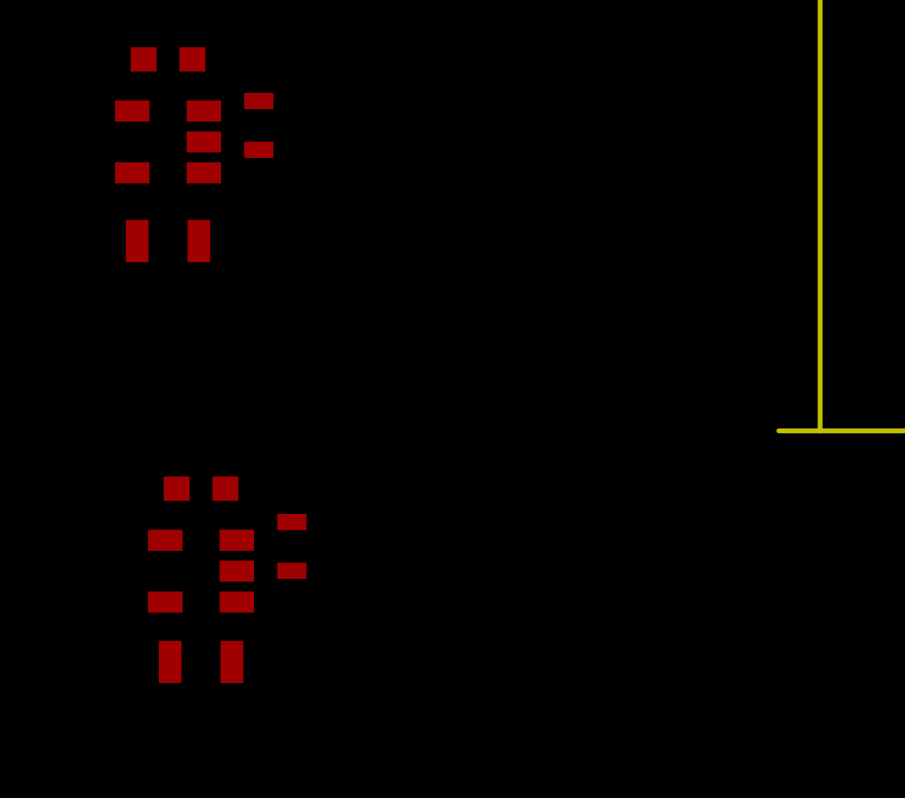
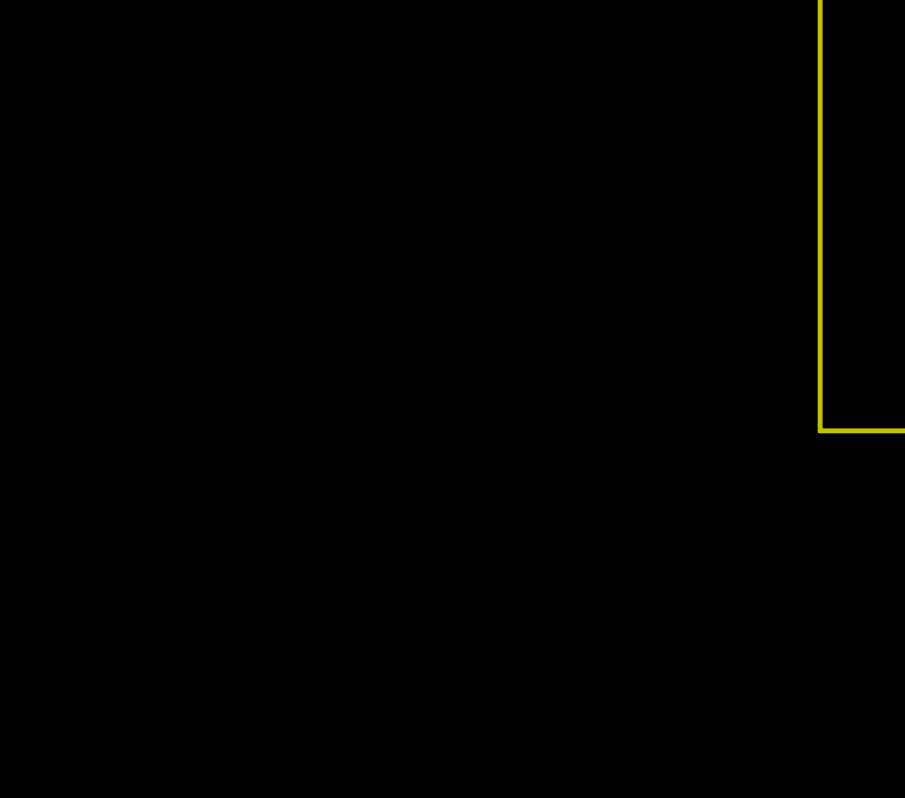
part: (168, 59) -> none
part: (258, 125) -> none
part: (168, 141) -> none
part: (168, 241) -> none
board edge: (820, 430) (778, 430) -> none
part: (201, 488) -> none
part: (291, 546) -> none
part: (201, 571) -> none
part: (201, 661) -> none

